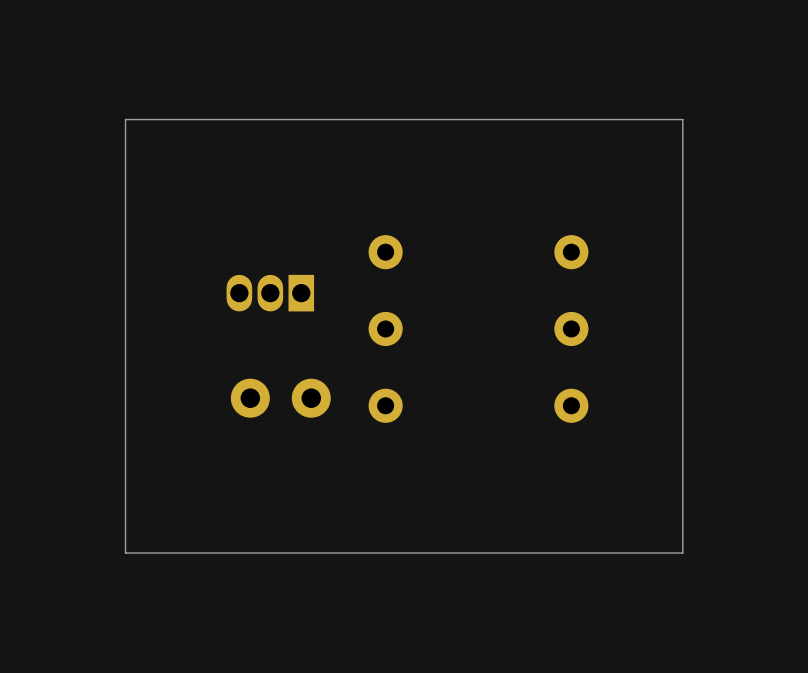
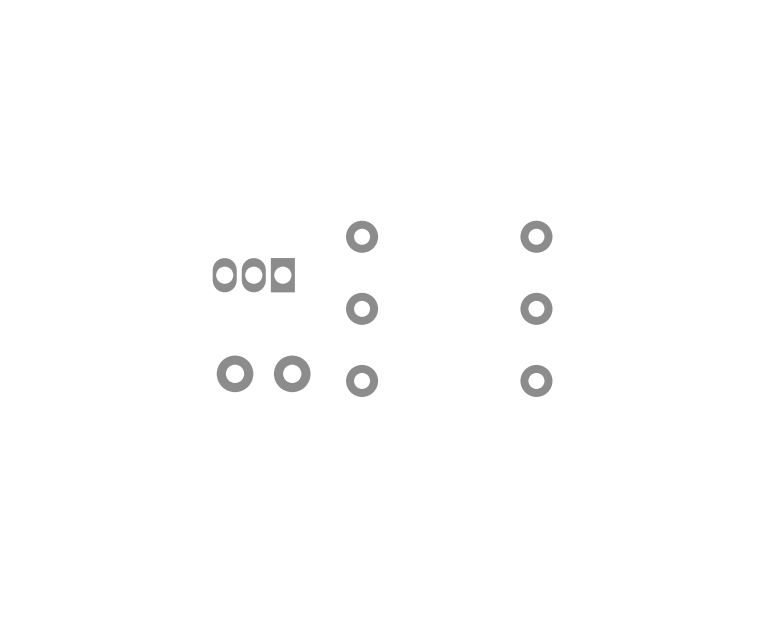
board edge: (682, 119) (682, 553) (125, 553) (125, 119) (682, 119) -> none

